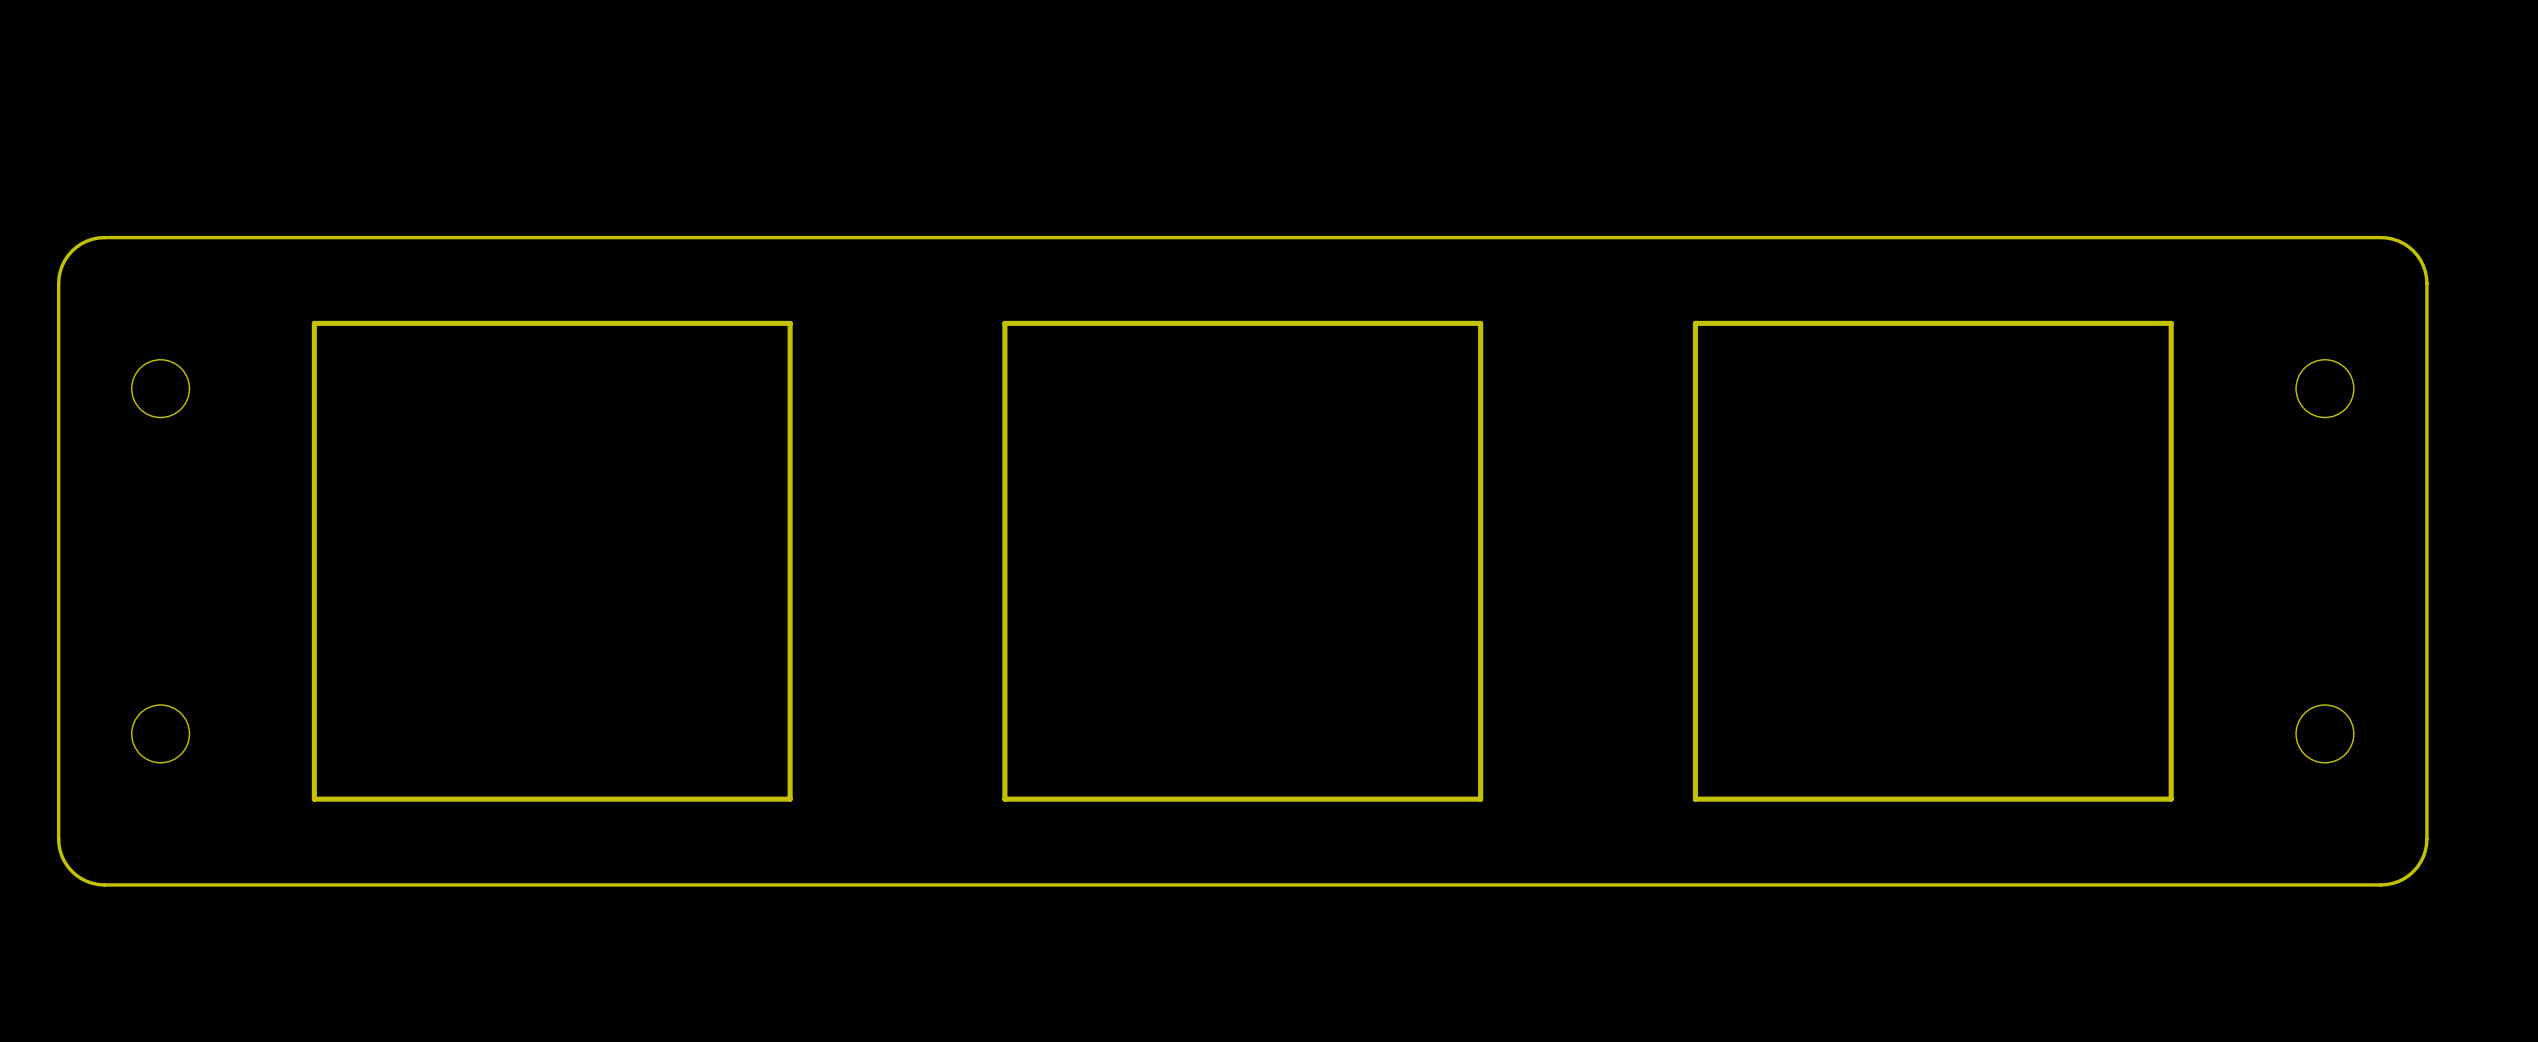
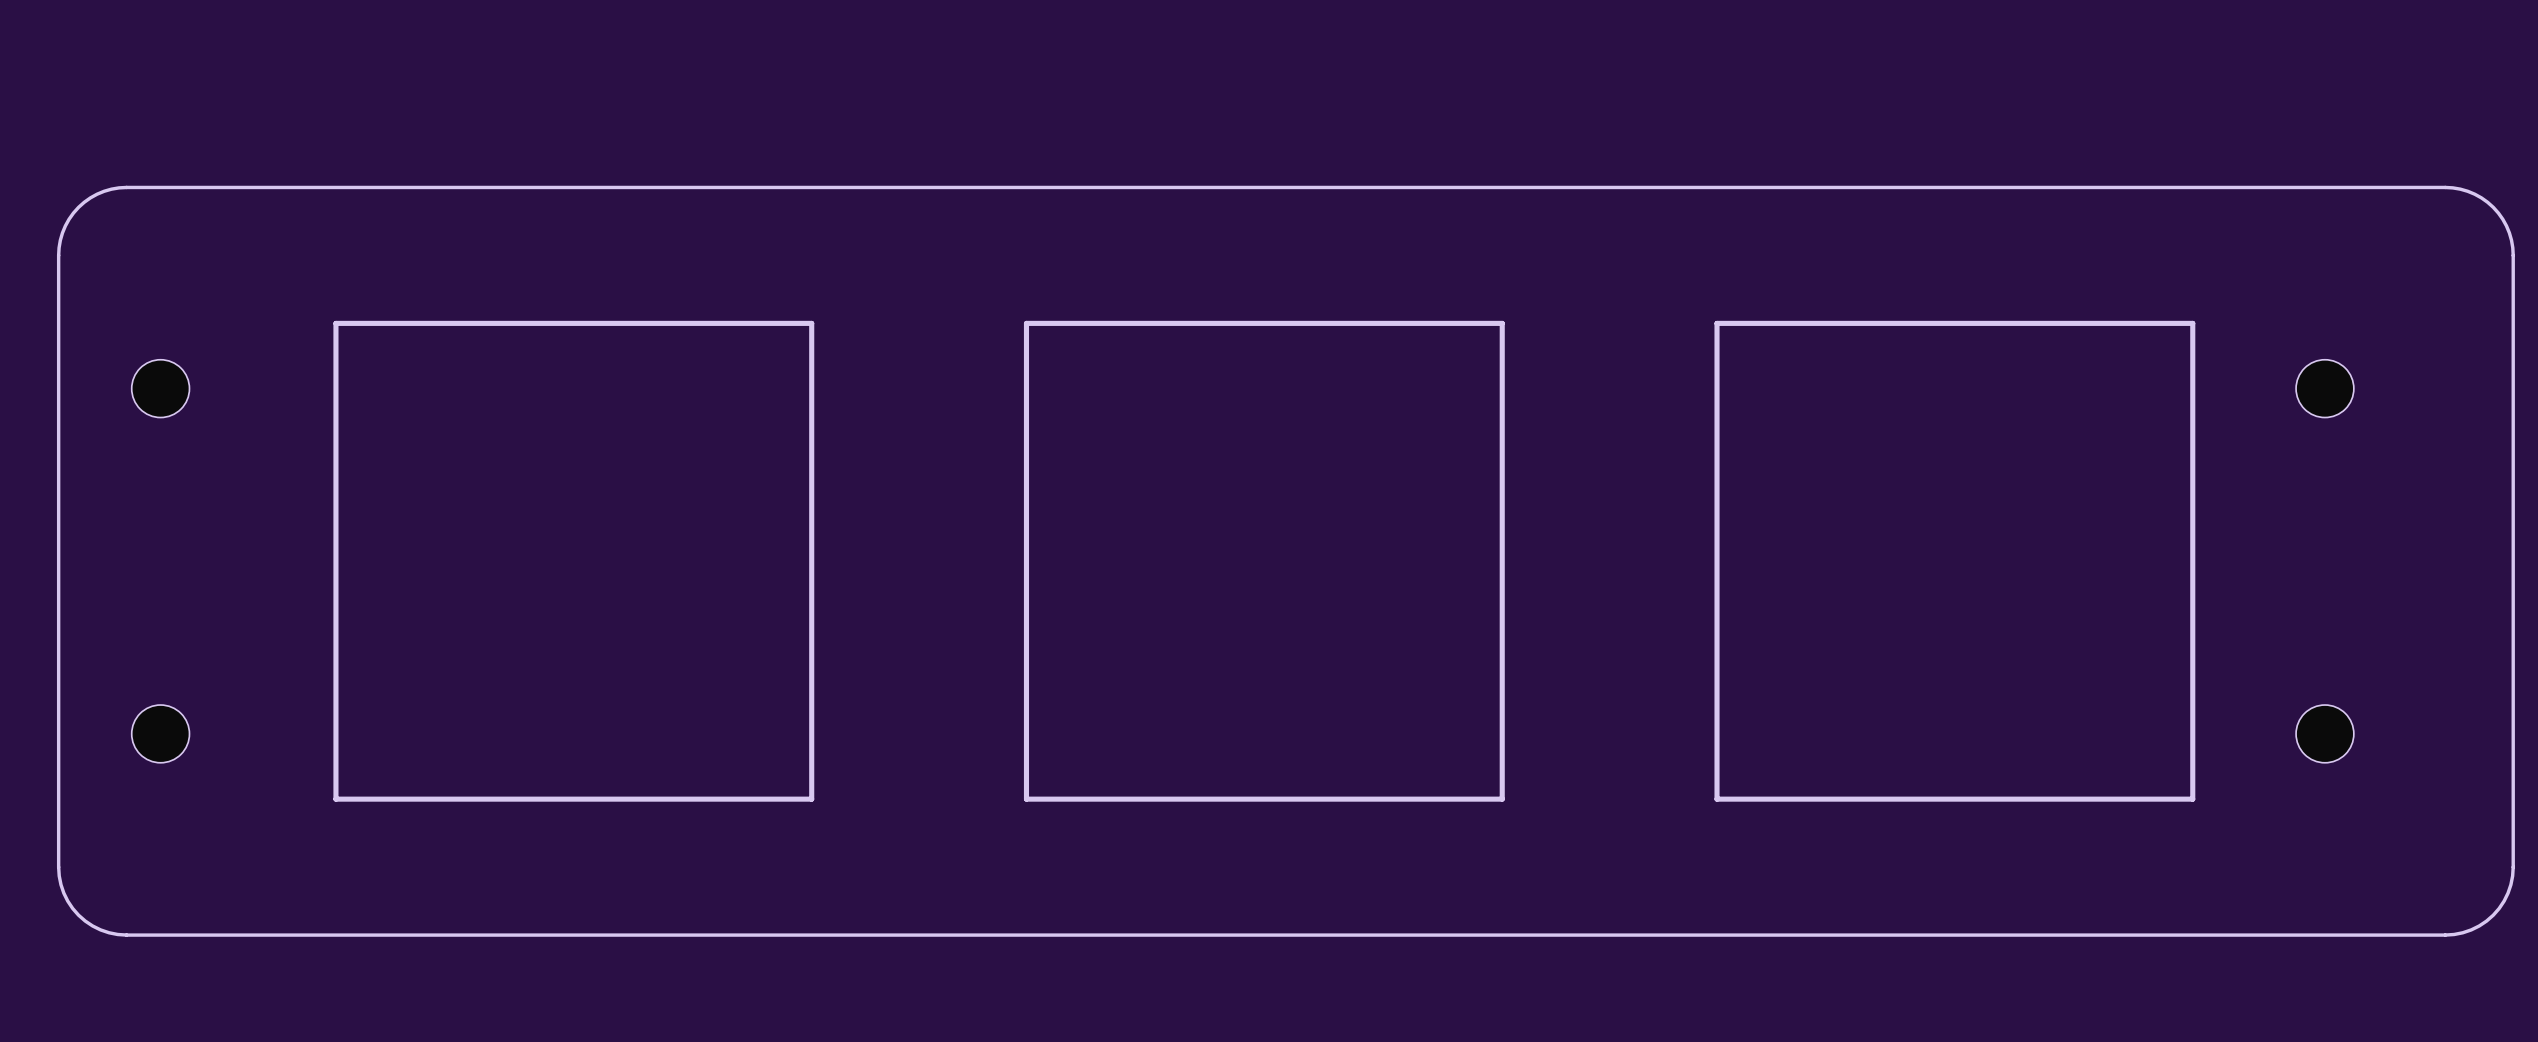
board edge: (58, 283) (62, 265) (72, 251) (86, 241) (104, 237) (2381, 237) (2398, 241) (2413, 251) (2423, 265) (2426, 283) (2426, 839) (2425, 850) (2417, 867) (2403, 878) (2392, 883) (2381, 884) (104, 884) (86, 881) (72, 871) (62, 856) (58, 839) -> (58, 283) (59, 247) (62, 232) (69, 219) (78, 207) (90, 197) (104, 191) (126, 187) (2445, 187) (2467, 191) (2481, 197) (2493, 207) (2506, 225) (2511, 240) (2513, 255) (2512, 875) (2508, 893) (2499, 908) (2479, 925) (2462, 932) (2445, 935) (126, 935) (100, 929) (85, 921) (72, 908) (60, 884) (58, 839)
board edge: (335, 323) (314, 323) (314, 799) (335, 799) -> (335, 323) (335, 799)
board edge: (790, 323) (790, 799) -> (790, 323) (811, 323) (811, 799) (790, 799)
board edge: (1026, 323) (1004, 323) (1004, 799) (1026, 799) -> (1026, 323) (1026, 799)
board edge: (1480, 323) (1480, 799) -> (1480, 323) (1502, 323) (1502, 799) (1480, 799)
board edge: (1717, 323) (1695, 323) (1695, 799) (1717, 799) -> (1717, 323) (1717, 799)
board edge: (2171, 323) (2171, 799) -> (2171, 323) (2192, 323) (2192, 799) (2171, 799)

